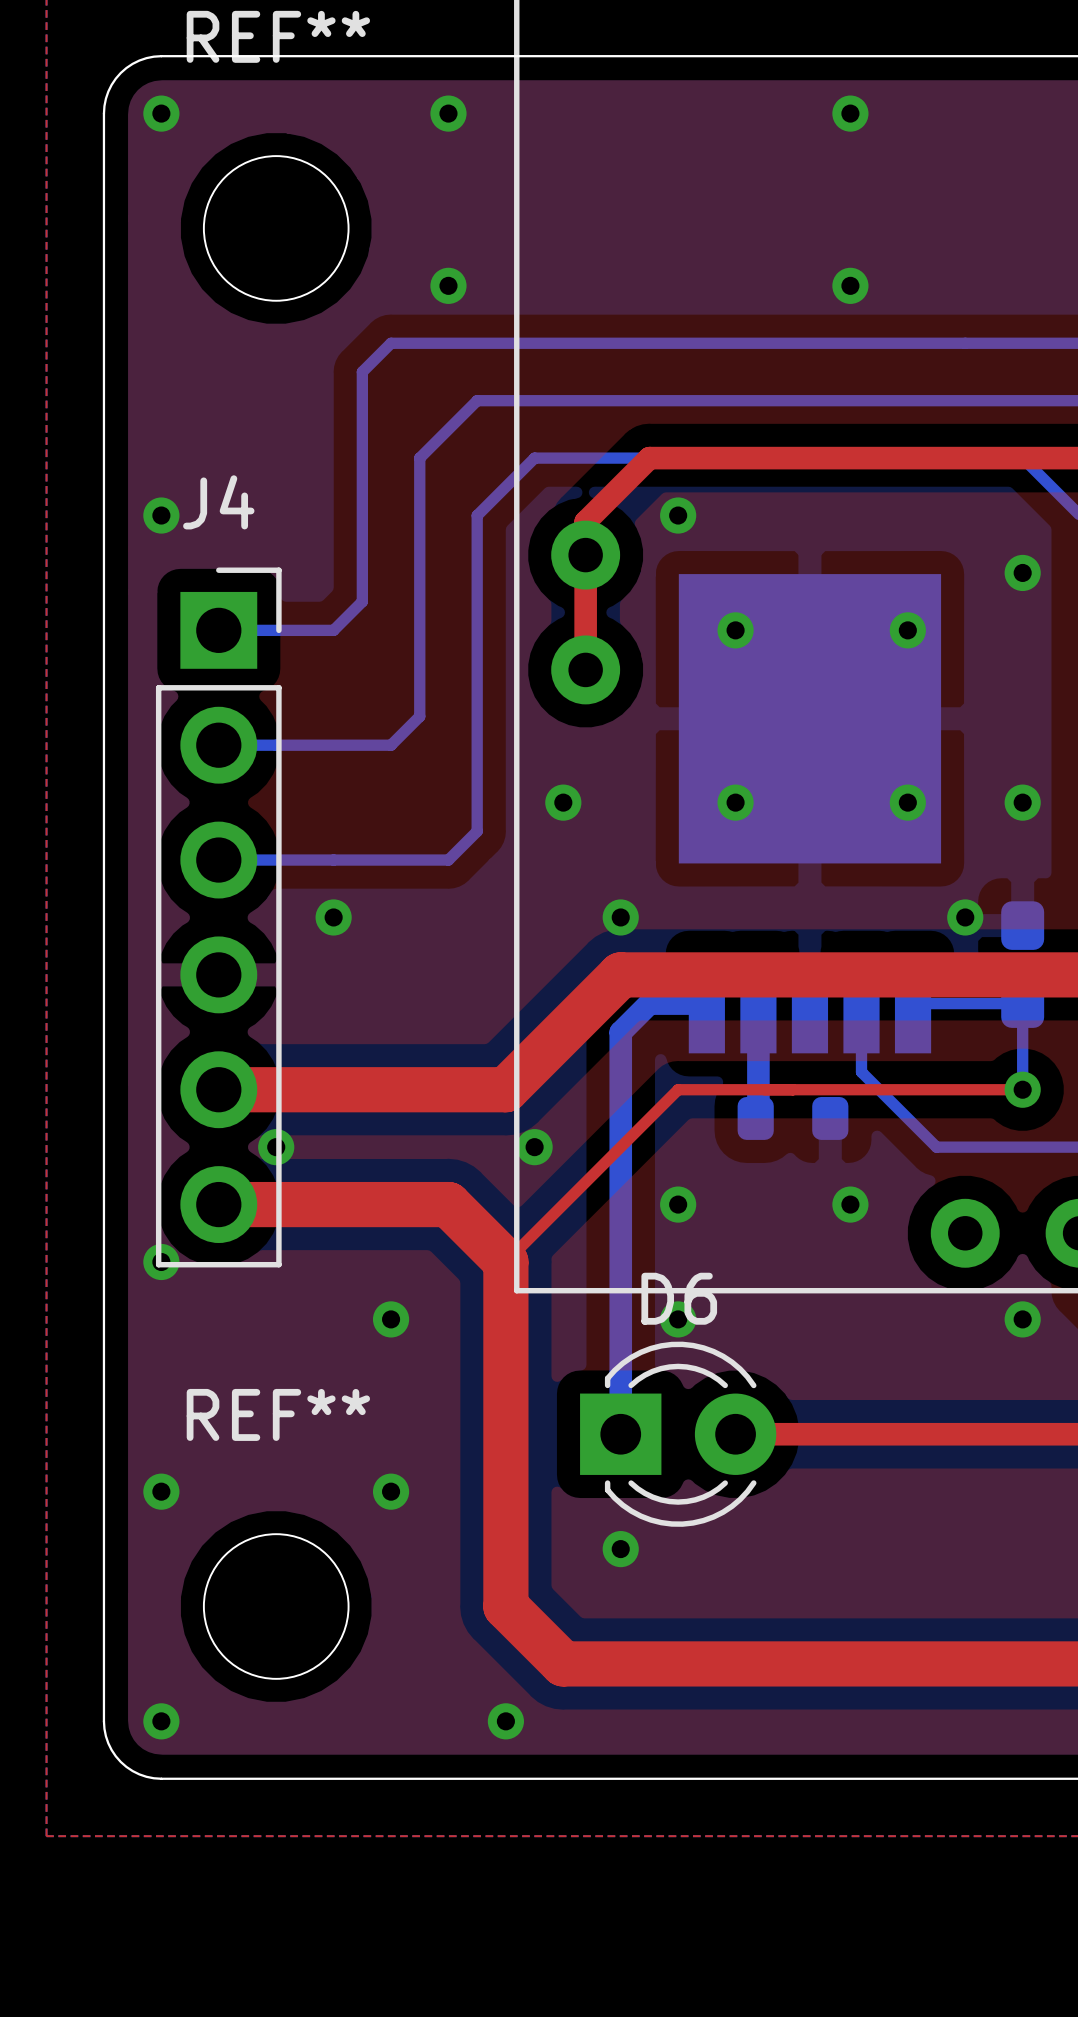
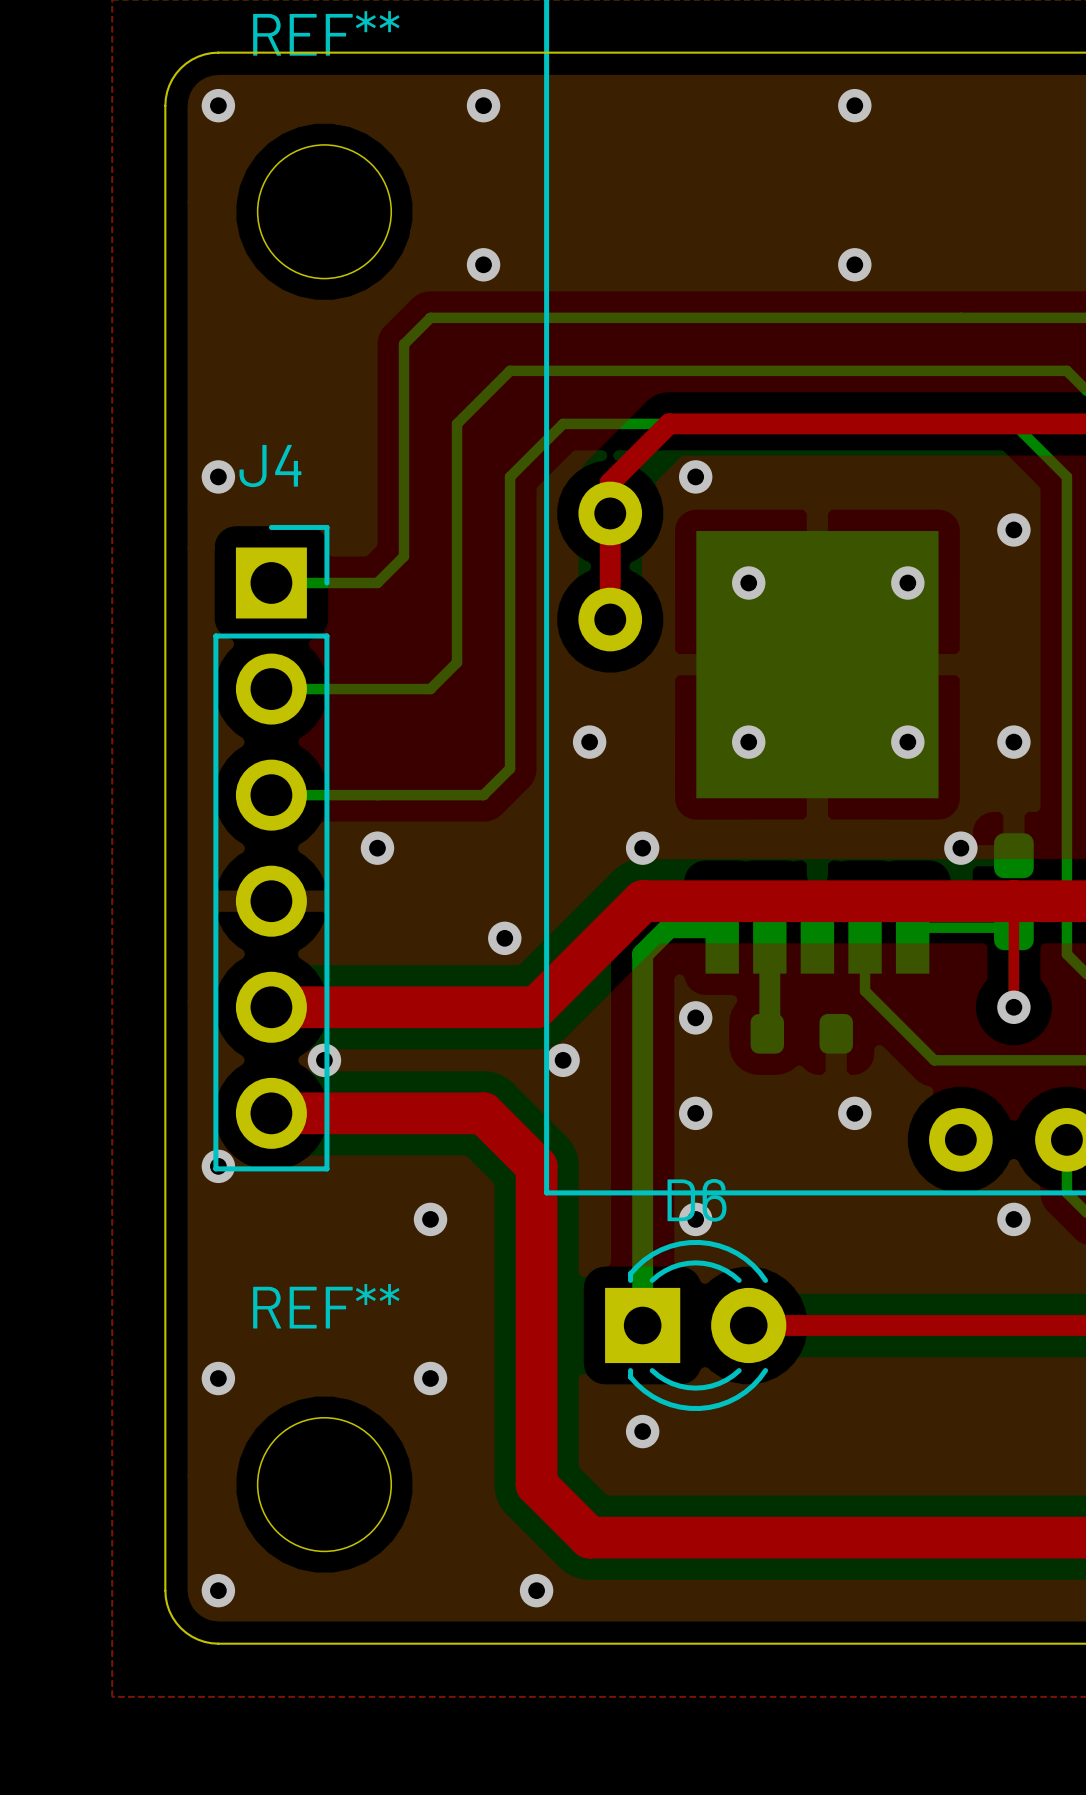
via: none -> (504, 938)
top track: (1022, 1089) (678, 1089) (505, 1261) -> (1013, 1007) (1013, 901)
via: none -> (695, 1017)

